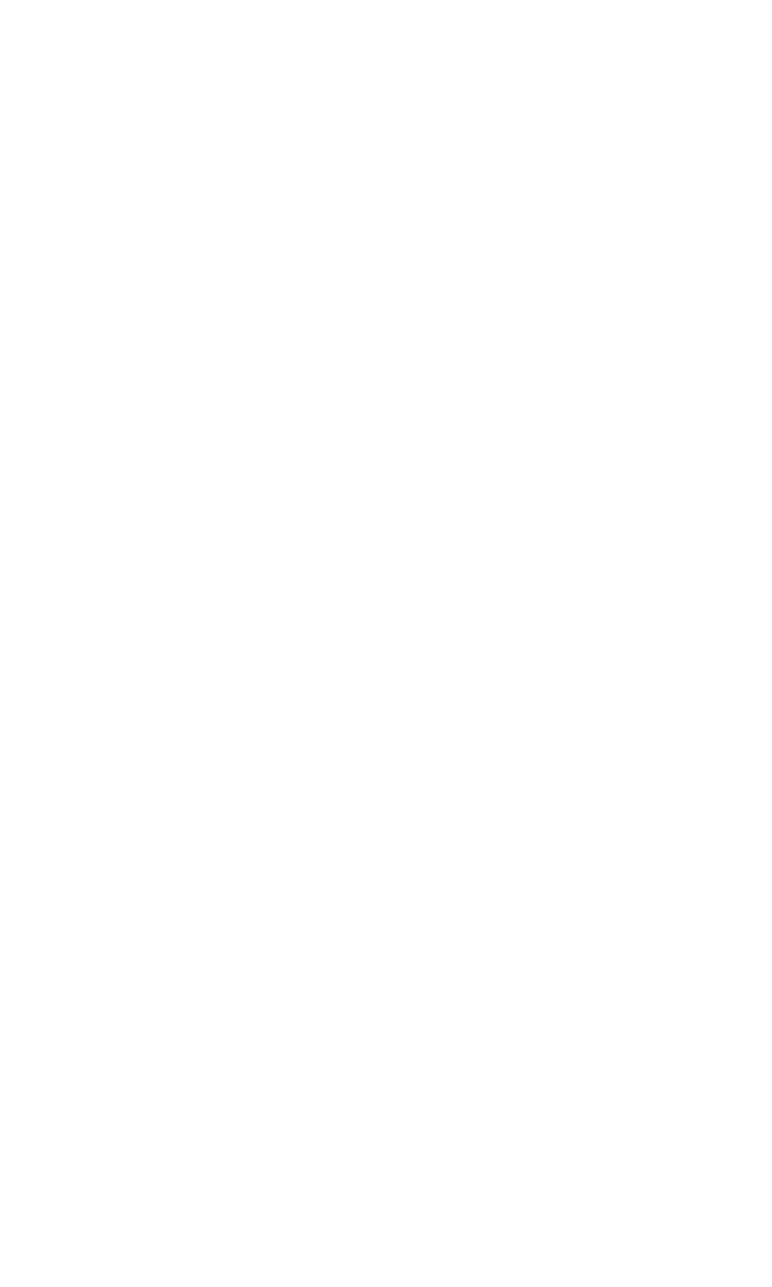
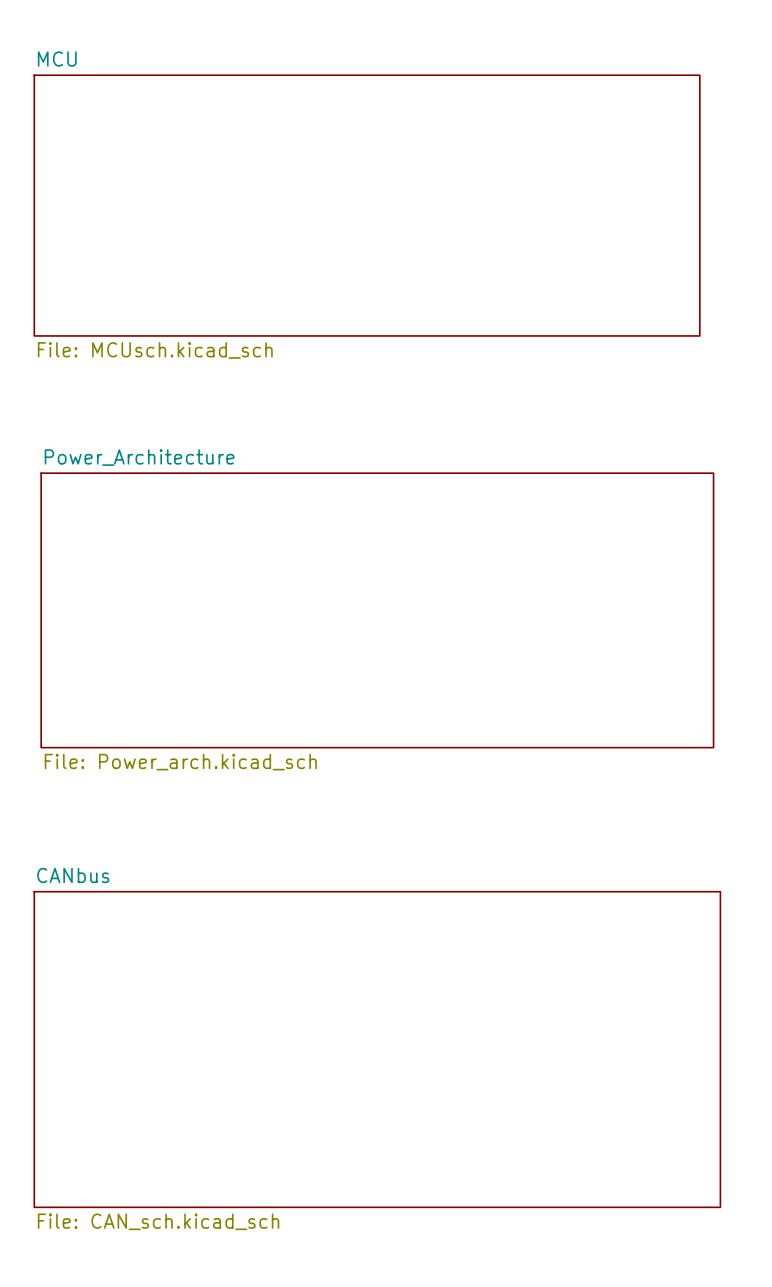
sheet MCU: none -> File: MCUsch.kicad_sch (367, 205)
sheet Power_Architecture: none -> File: Power_arch.kicad_sch (377, 610)
sheet CANbus: none -> File: CAN_sch.kicad_sch (377, 1049)

